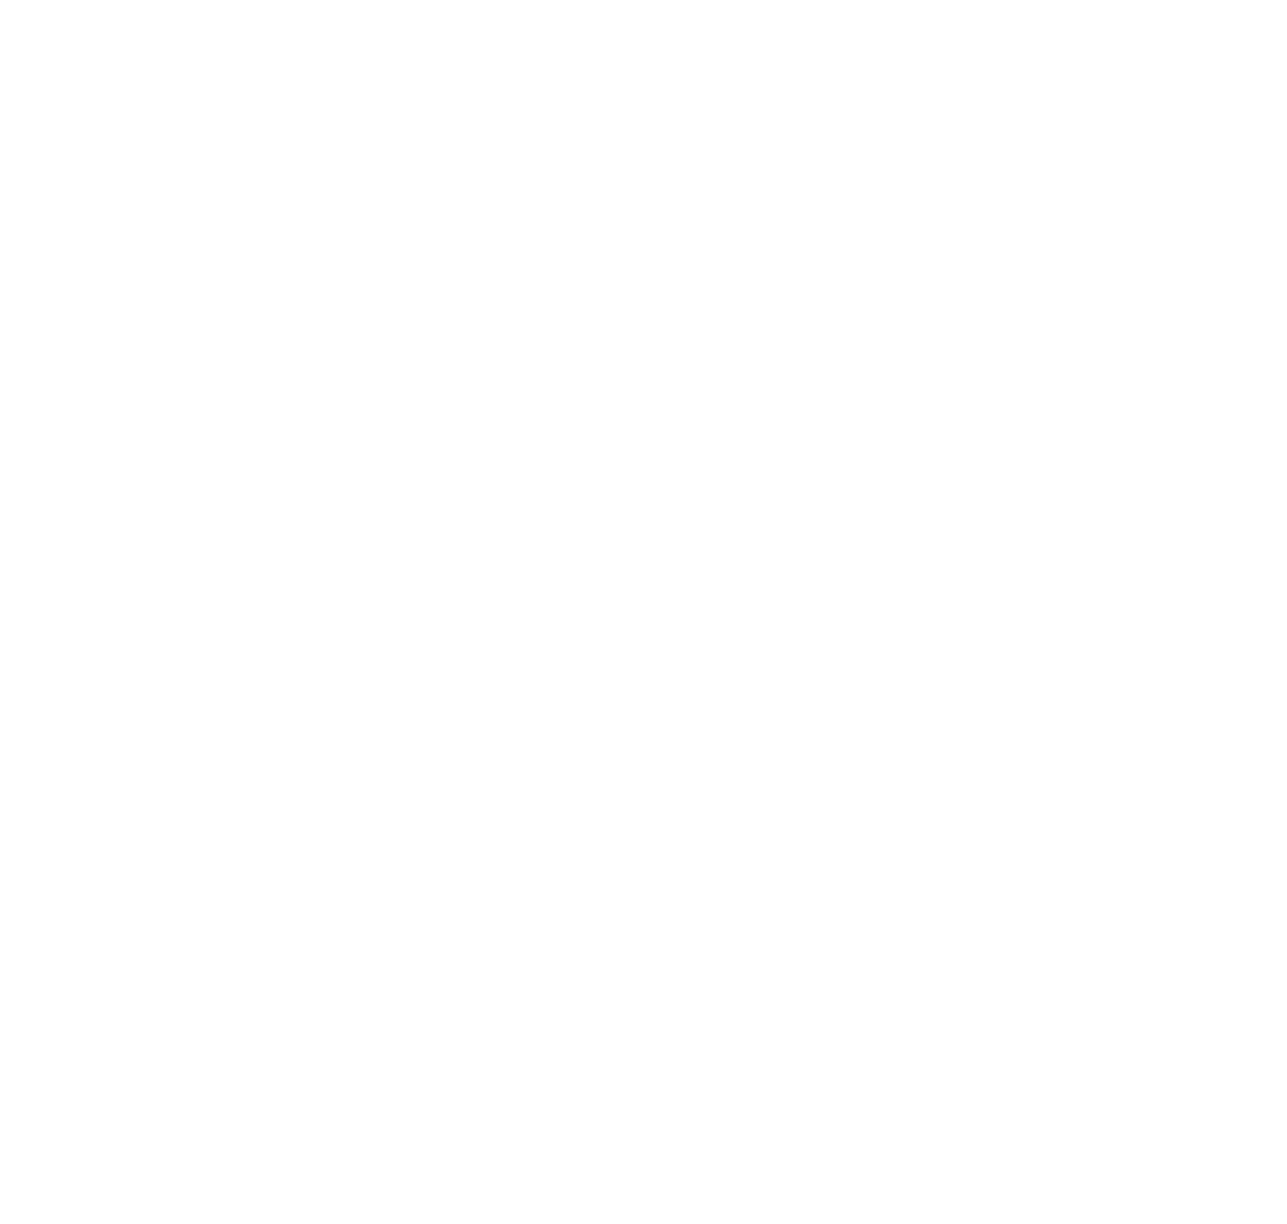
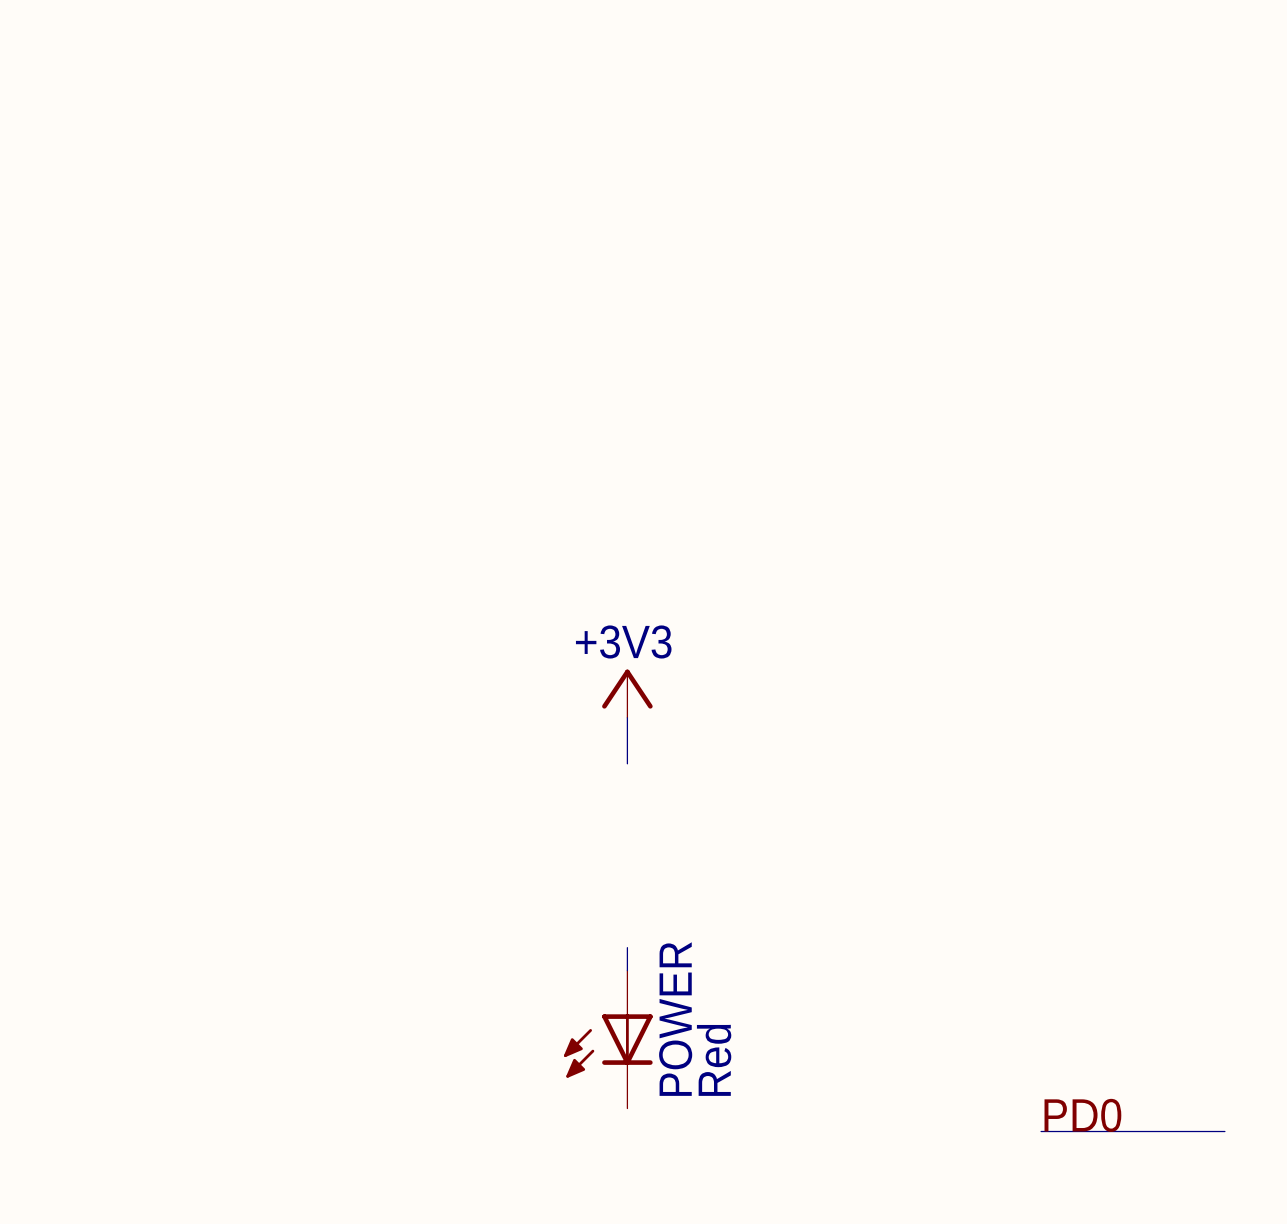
power symbol: none -> +3V3 (627, 693)
wire: none -> (627, 717) (627, 763)
wire: none -> (627, 947) (627, 970)
POWER: none -> Red (608, 1039)
label: none -> PD0 (1082, 1115)
wire: none -> (1041, 1131) (1224, 1131)

